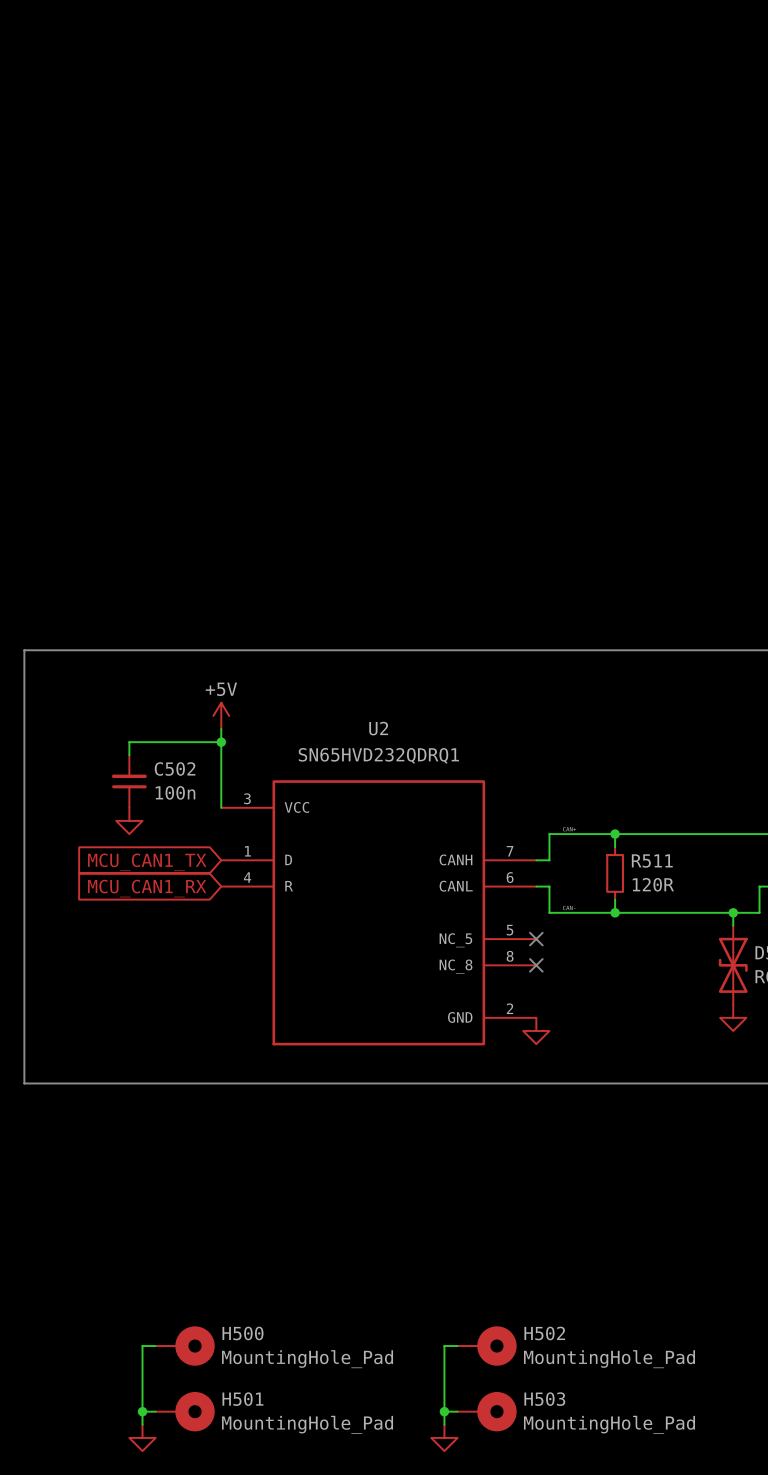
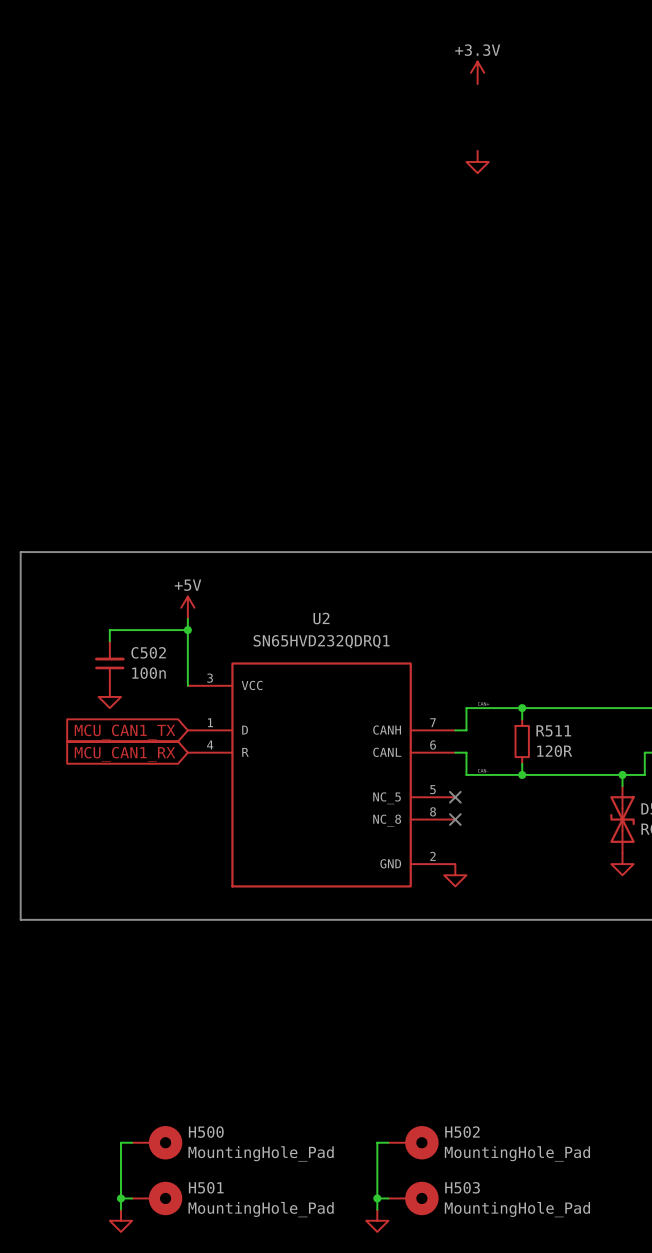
power symbol: none -> +3.3V (477, 72)
power symbol: none -> (477, 161)

